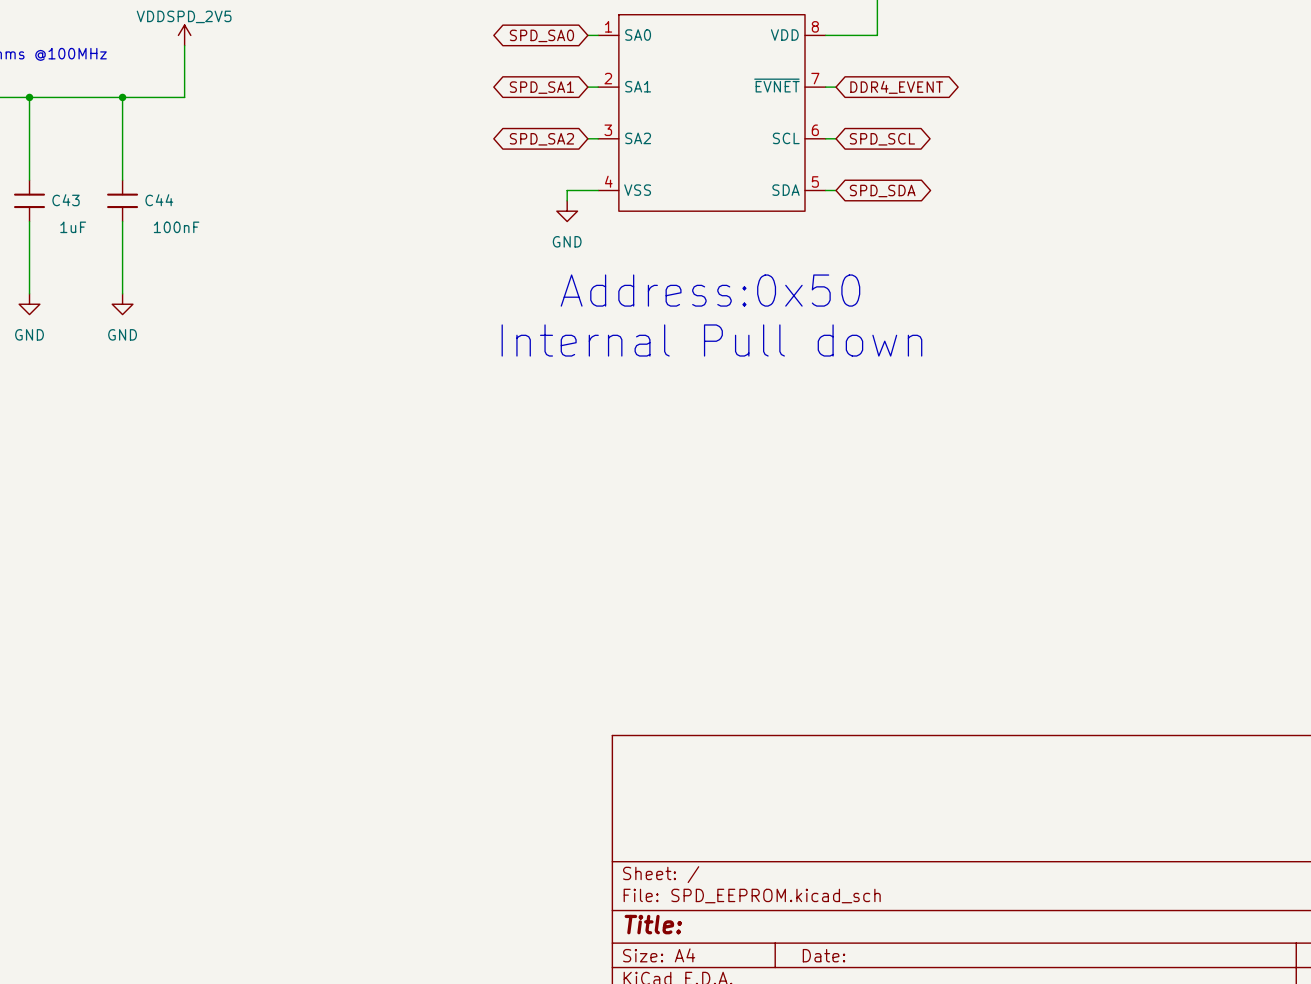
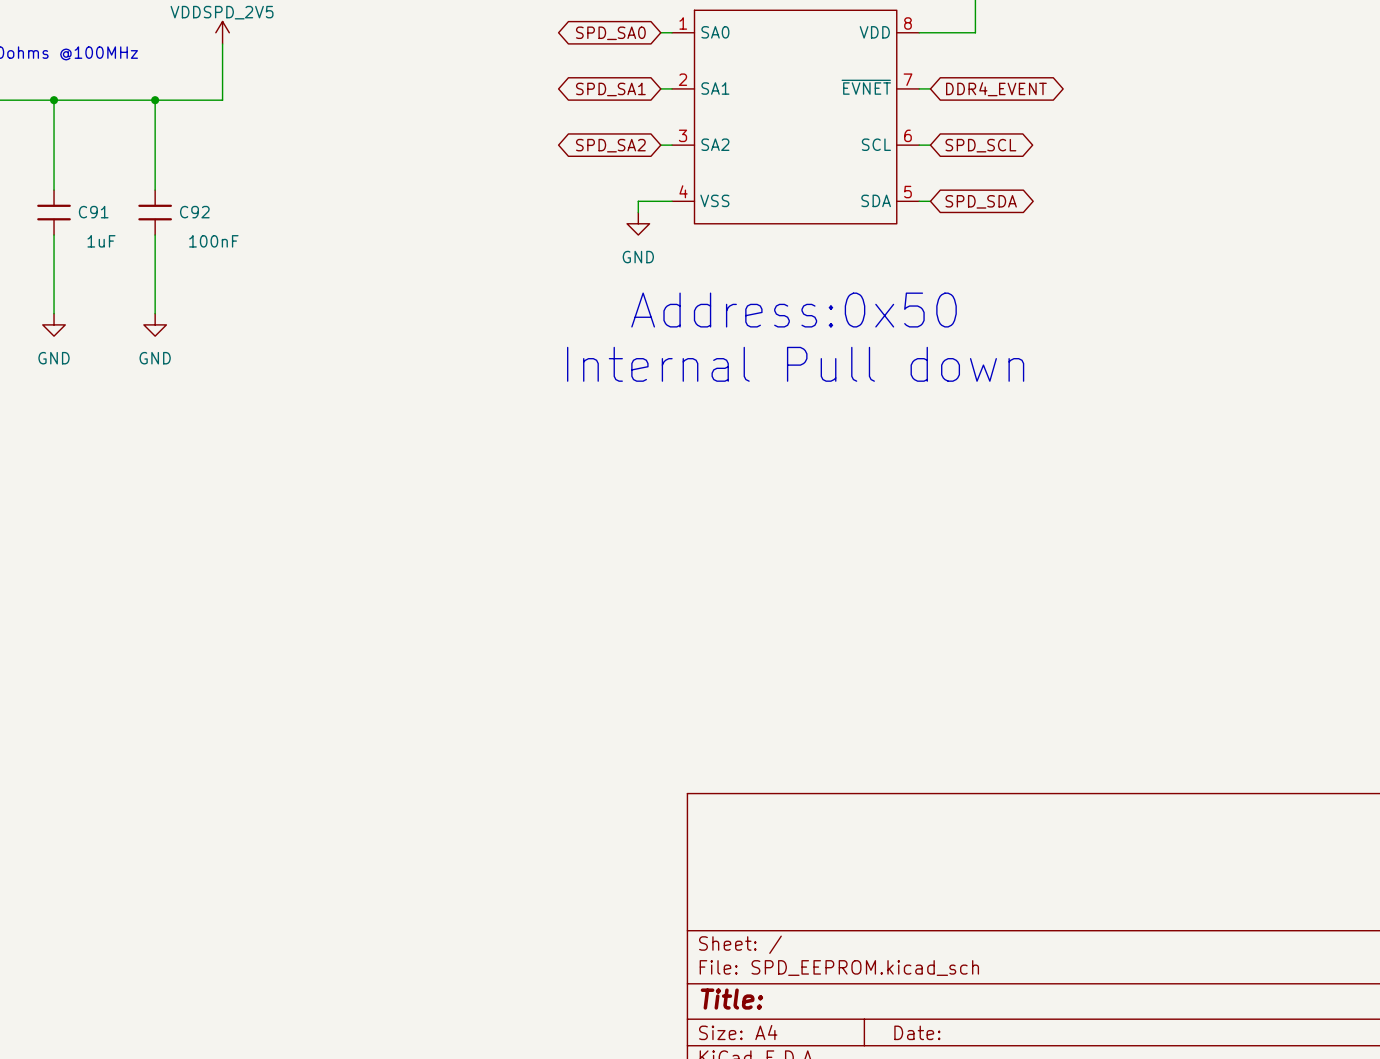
C43 name: C43 (66, 200) -> C91 (93, 212)
C44 name: C44 (159, 200) -> C92 (194, 212)

